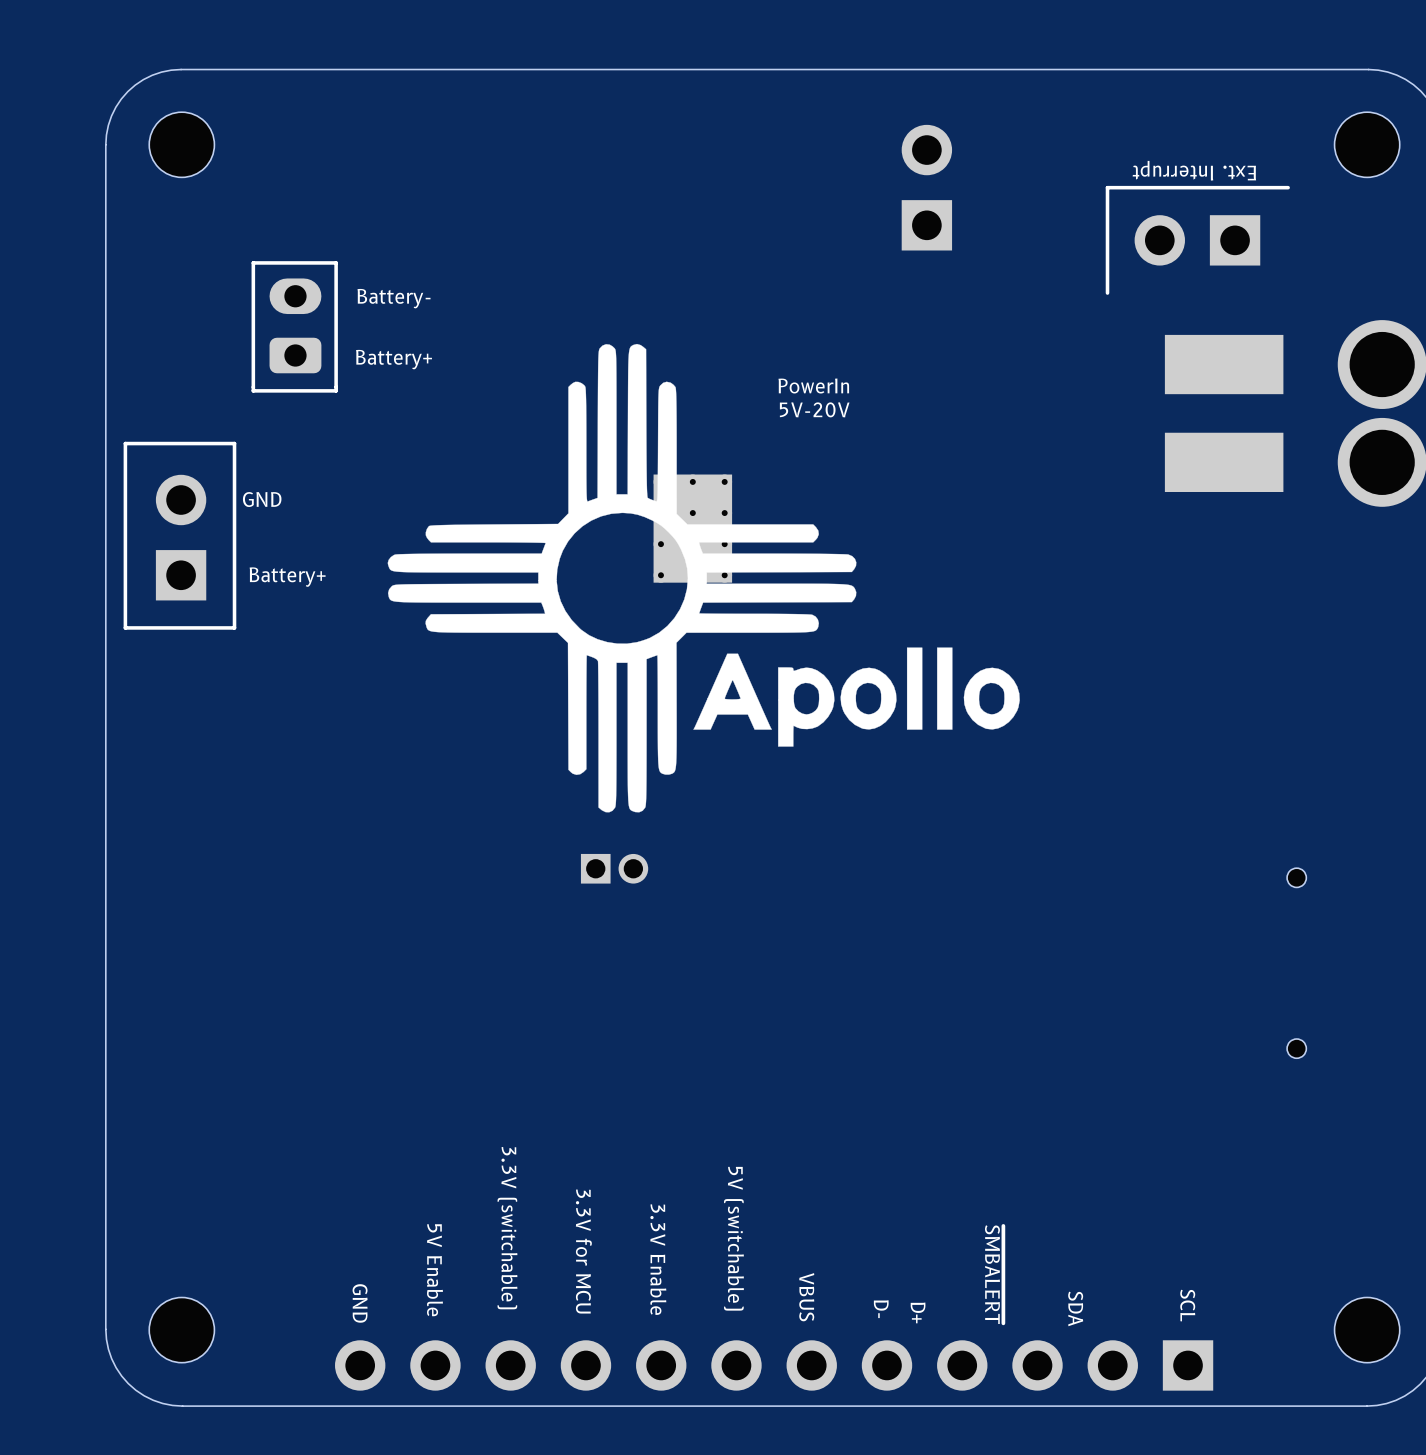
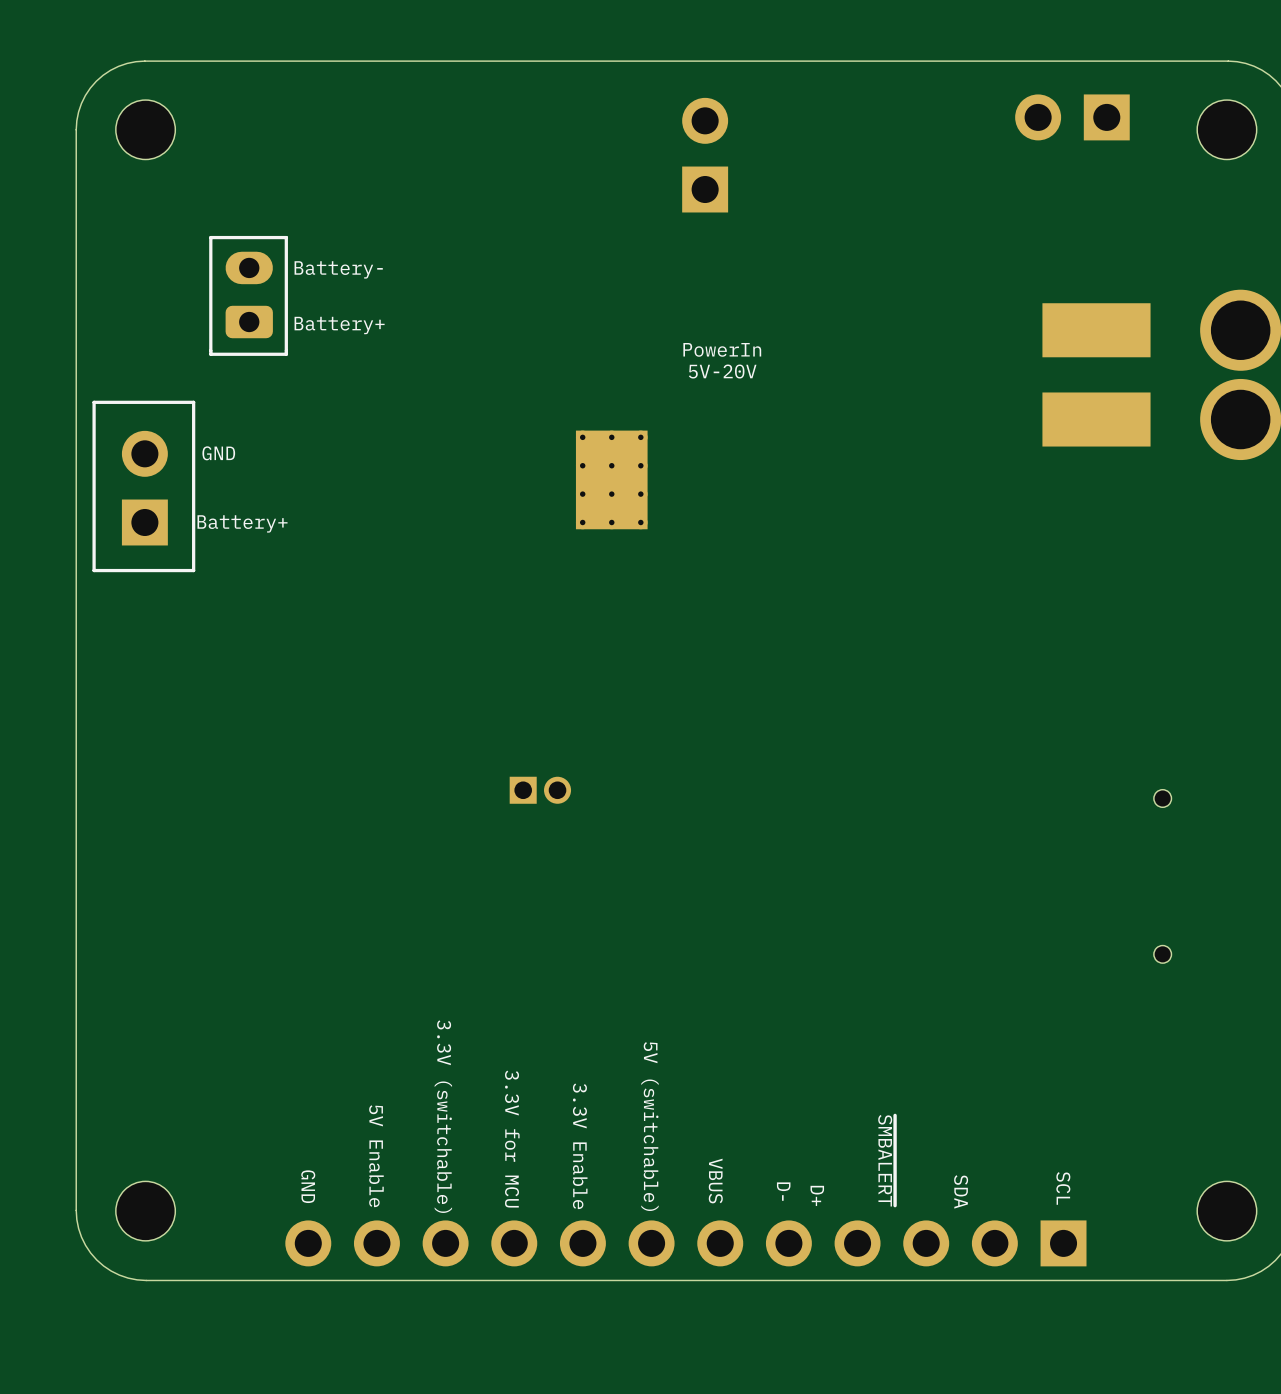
text: Ext. Interrupt (1194, 170) -> none
part position: (926, 187) -> (705, 155)
line: (1288, 187) (1107, 187) (1107, 293) -> none
part position: (1197, 240) -> (1072, 117)
drawing: [387, 343, 1020, 813] -> none

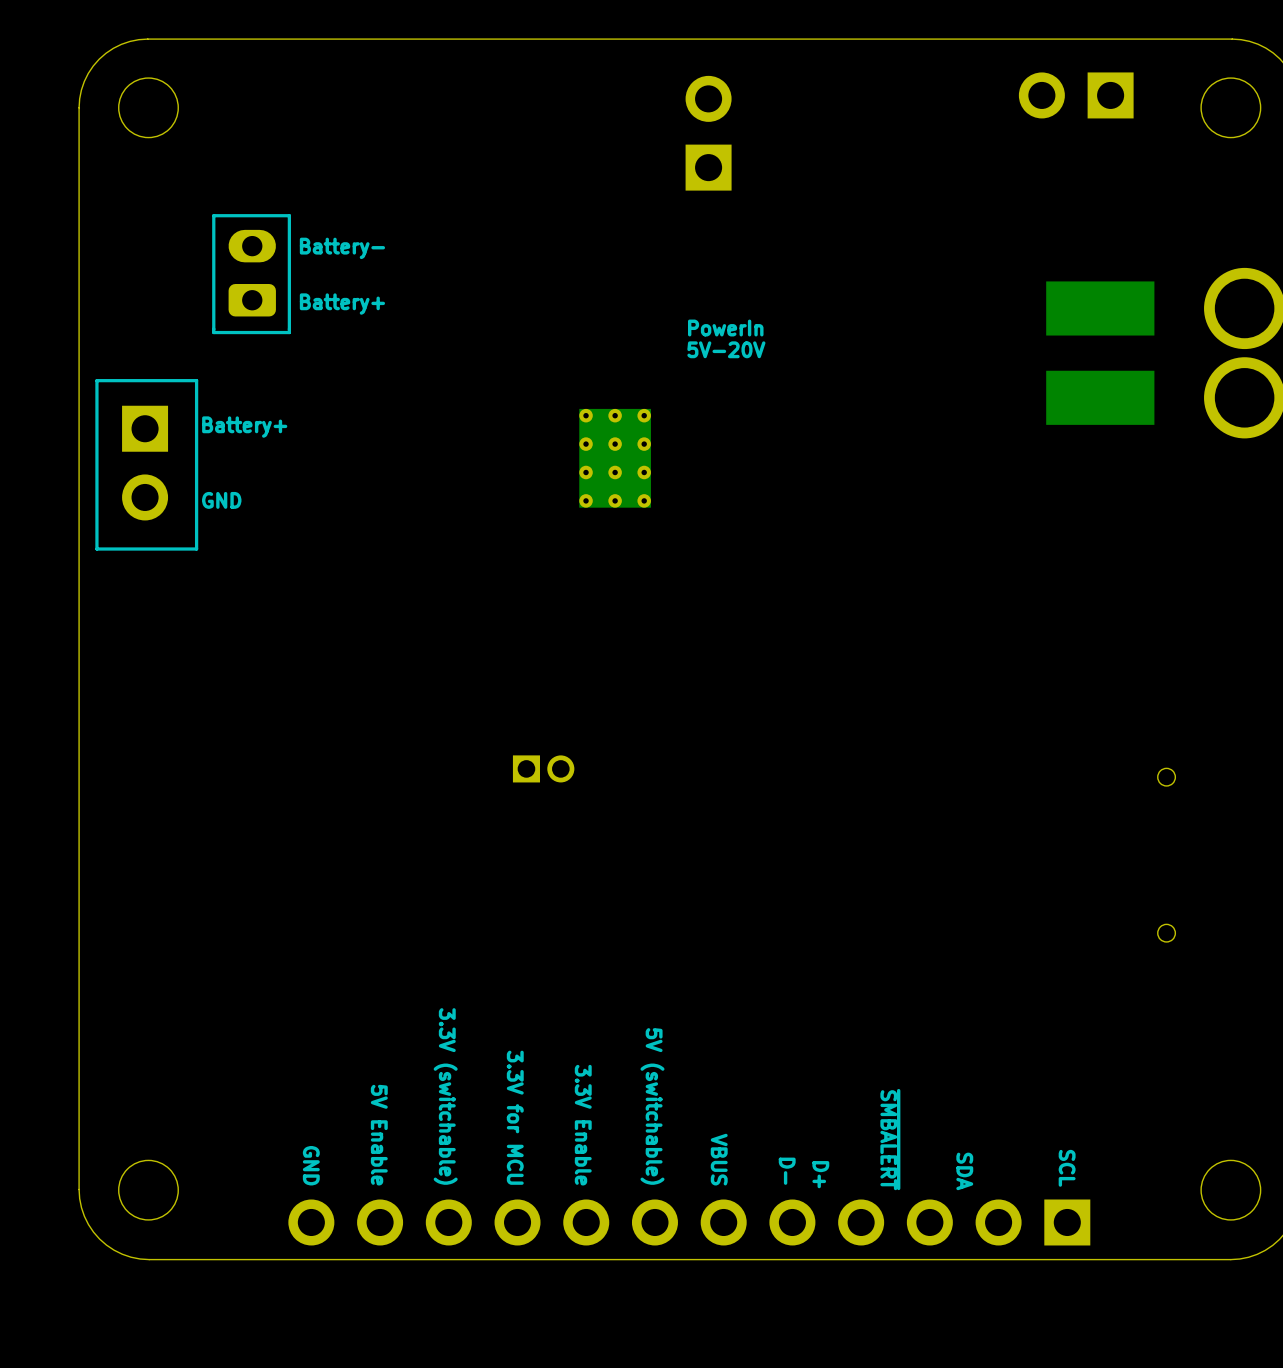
text: GND (218, 453) -> Battery+ (244, 427)
part rotation: 0° (144, 488) -> 180° (145, 463)
text: Battery+ (242, 523) -> GND (221, 500)

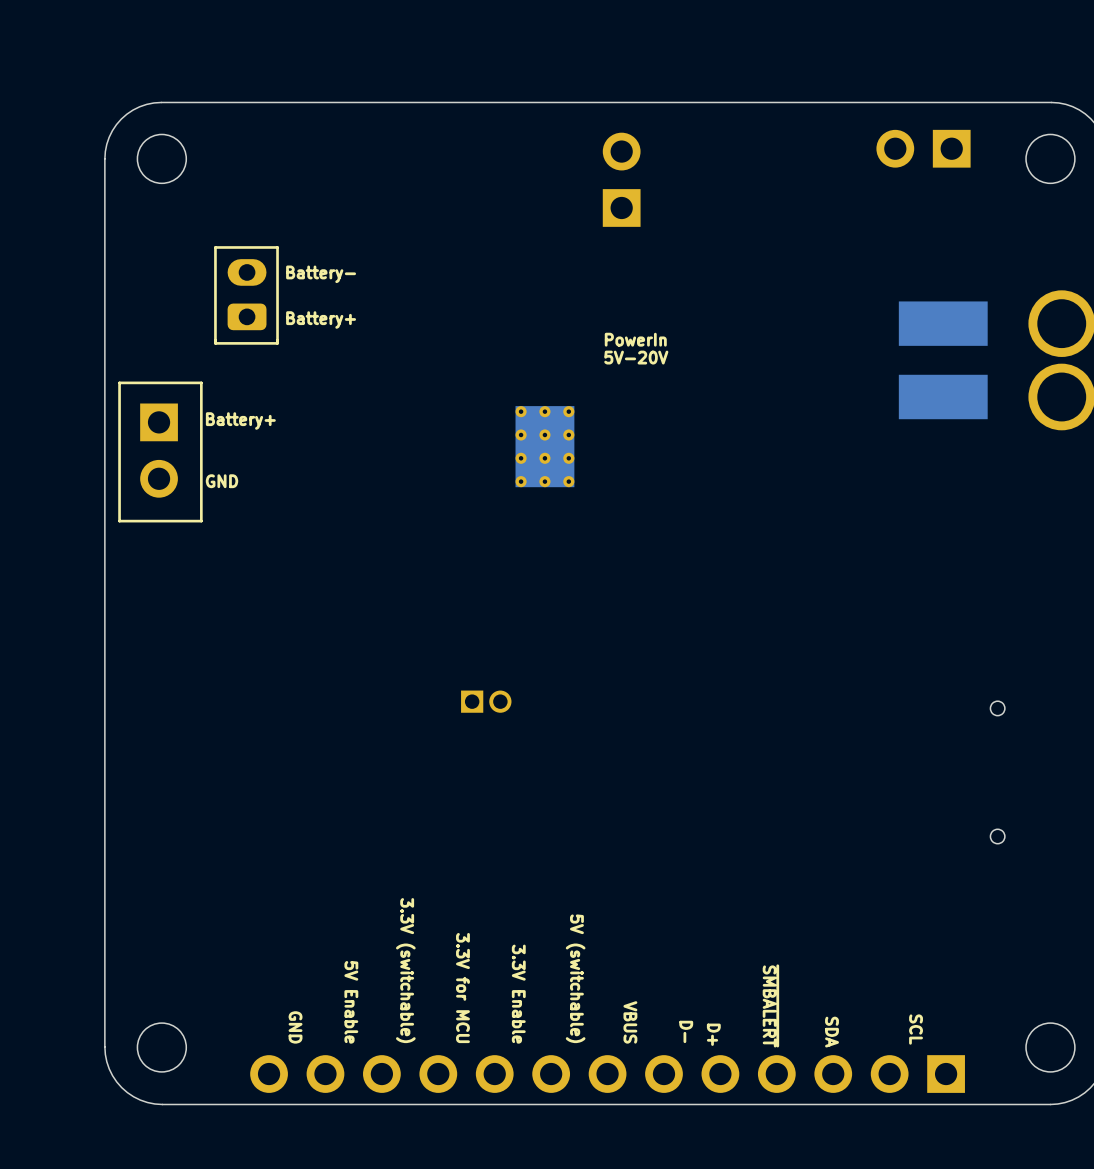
part footprint: [288, 1199, 1091, 1246] -> [250, 1055, 965, 1093]

